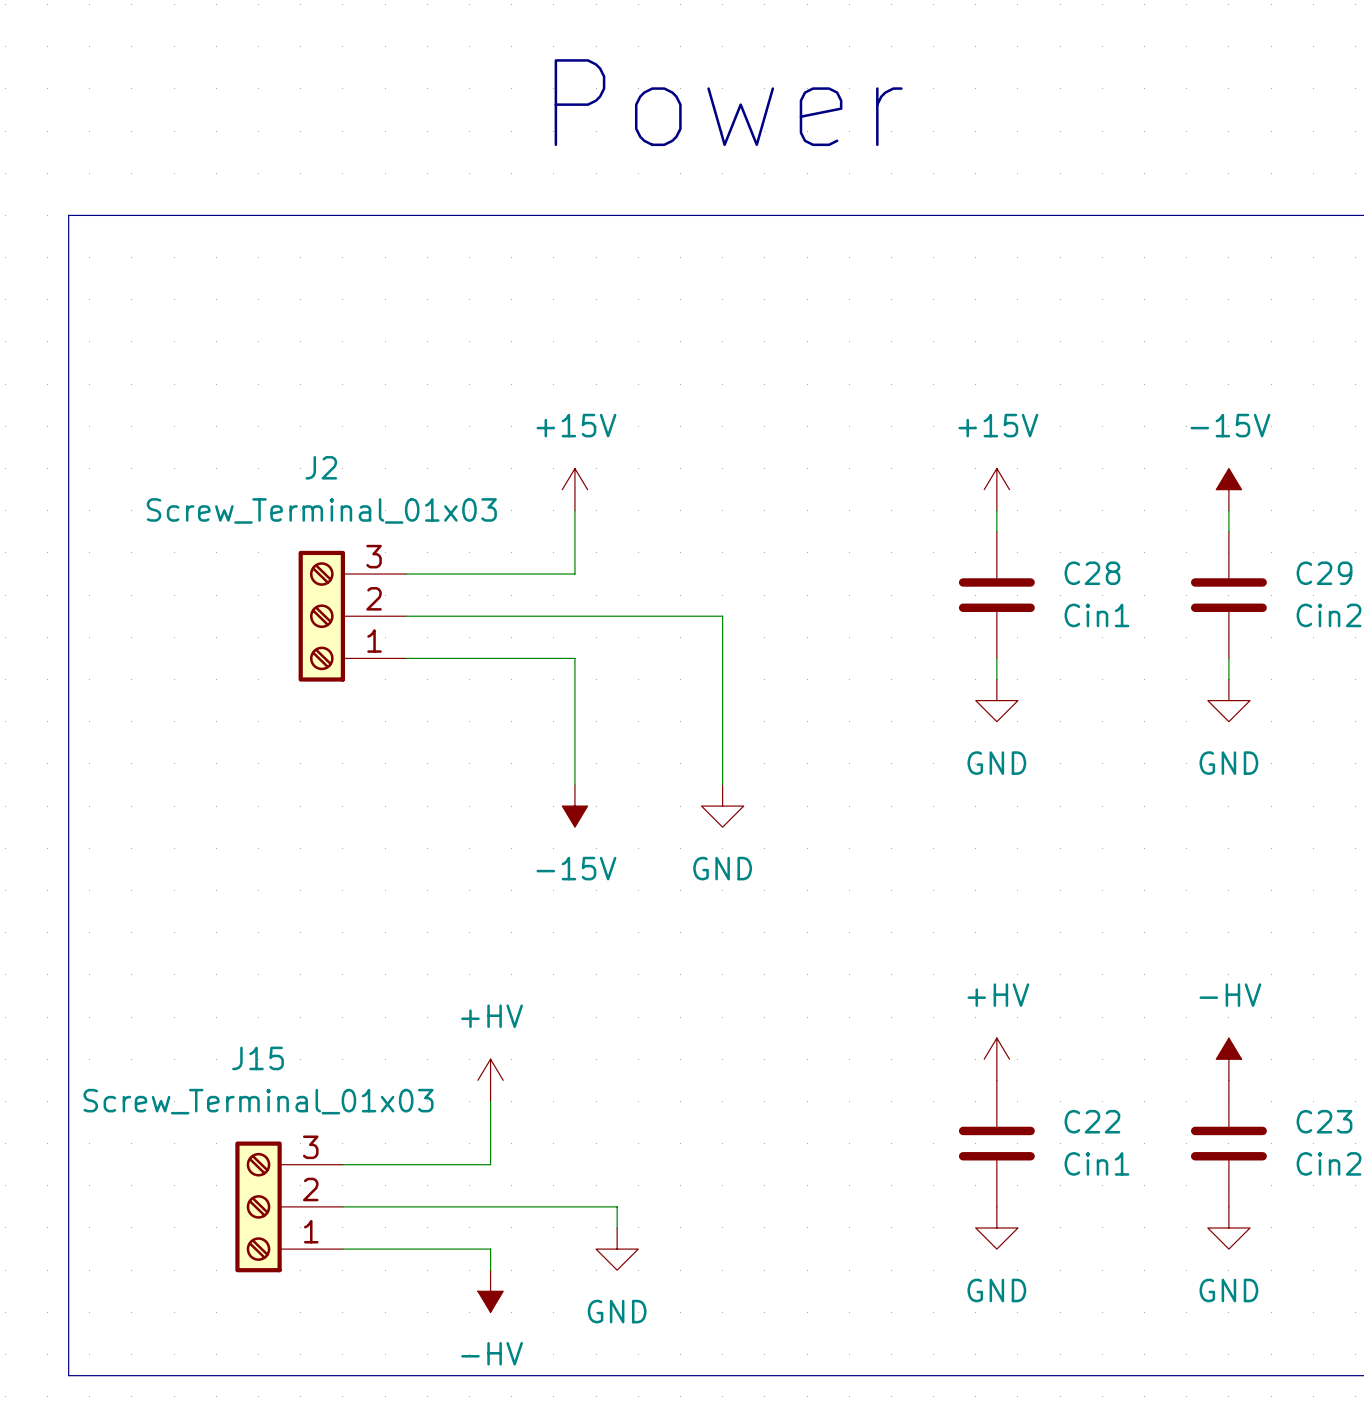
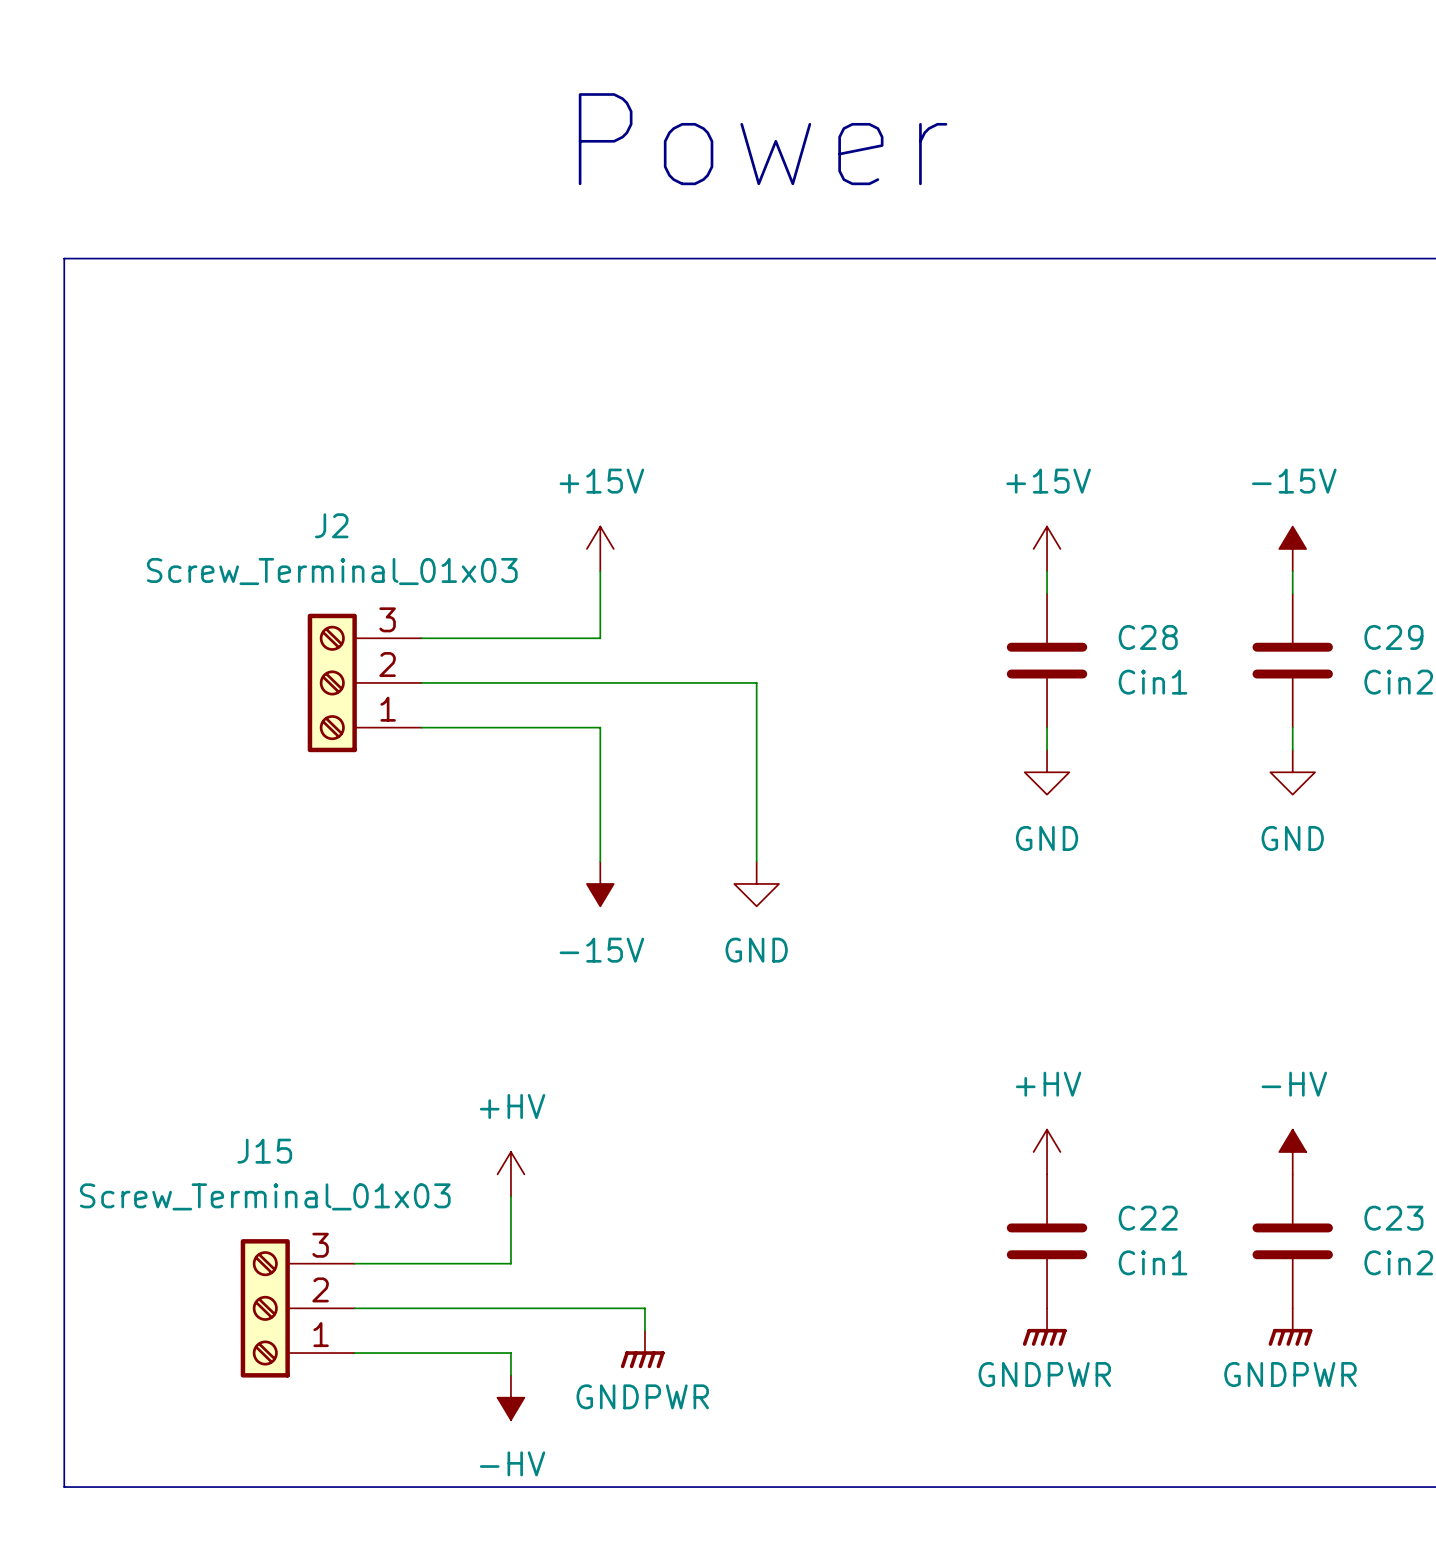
power symbol: GND (996, 1227) -> GNDPWR (1044, 1327)
power symbol: GND (1228, 1227) -> GNDPWR (1290, 1327)
power symbol: GND (617, 1249) -> GNDPWR (642, 1349)

